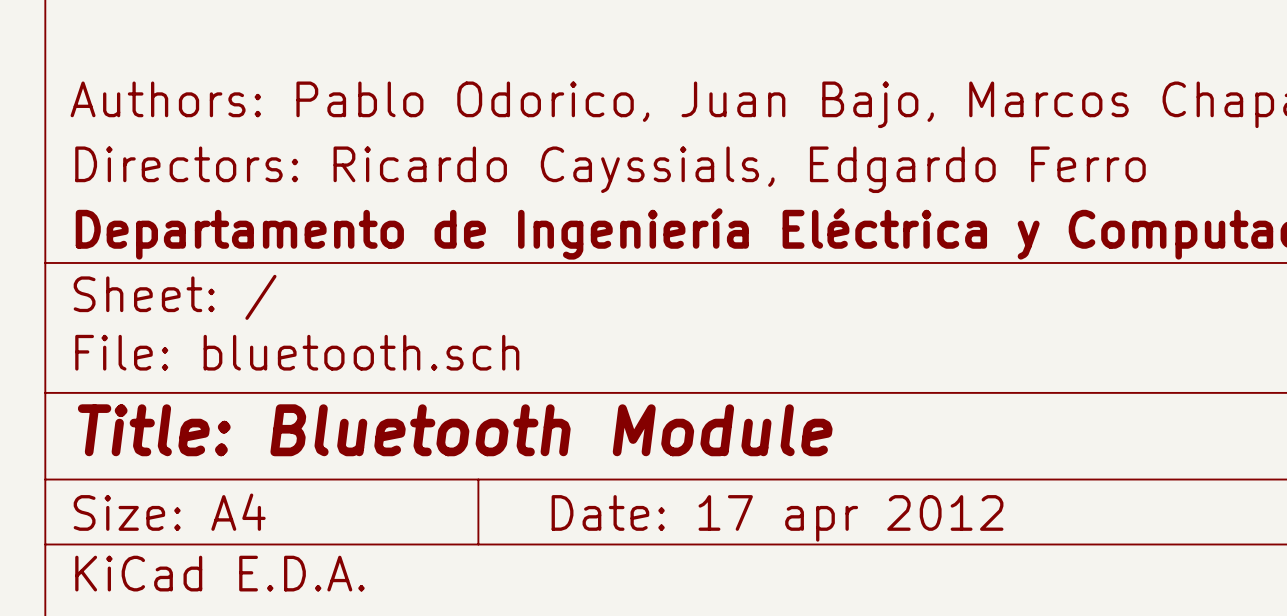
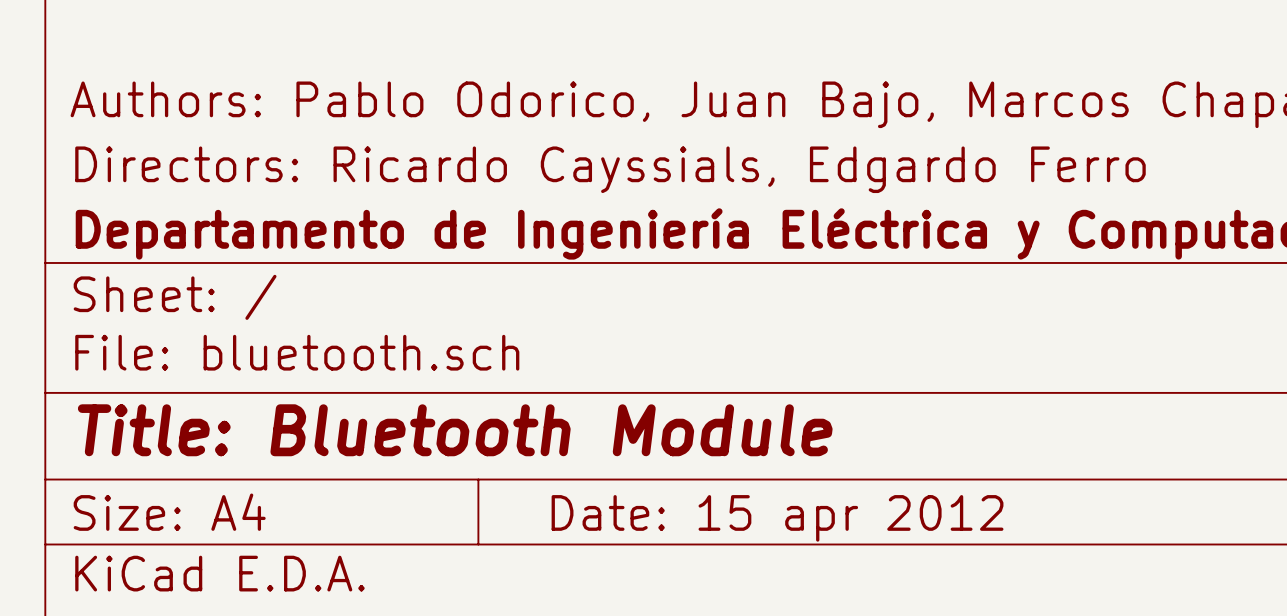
title block: Date: 17 apr 2012 (777, 518) -> Date: 15 apr 2012 (777, 518)

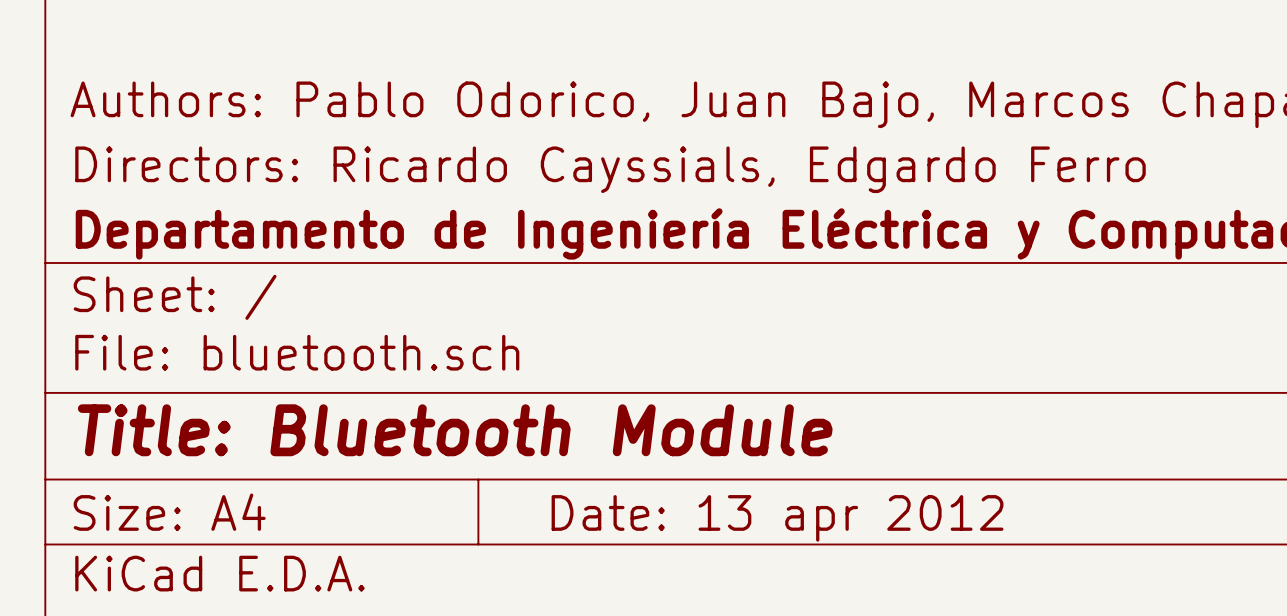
title block: Date: 15 apr 2012 (777, 518) -> Date: 13 apr 2012 (777, 518)

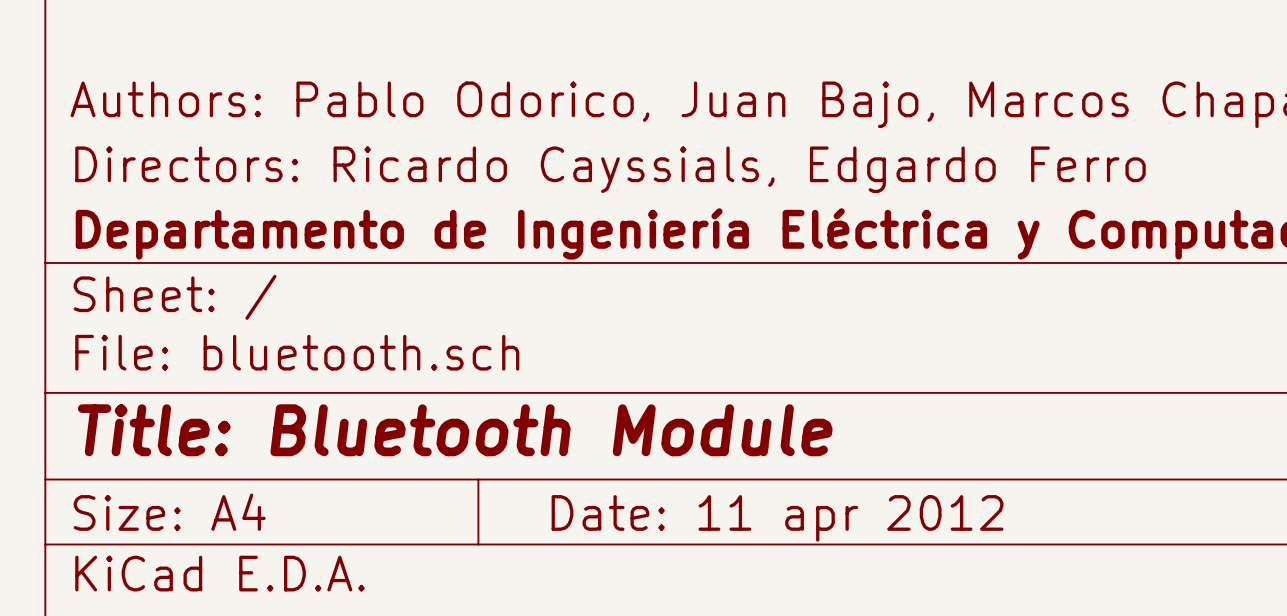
title block: Date: 13 apr 2012 (777, 518) -> Date: 11 apr 2012 (777, 518)

